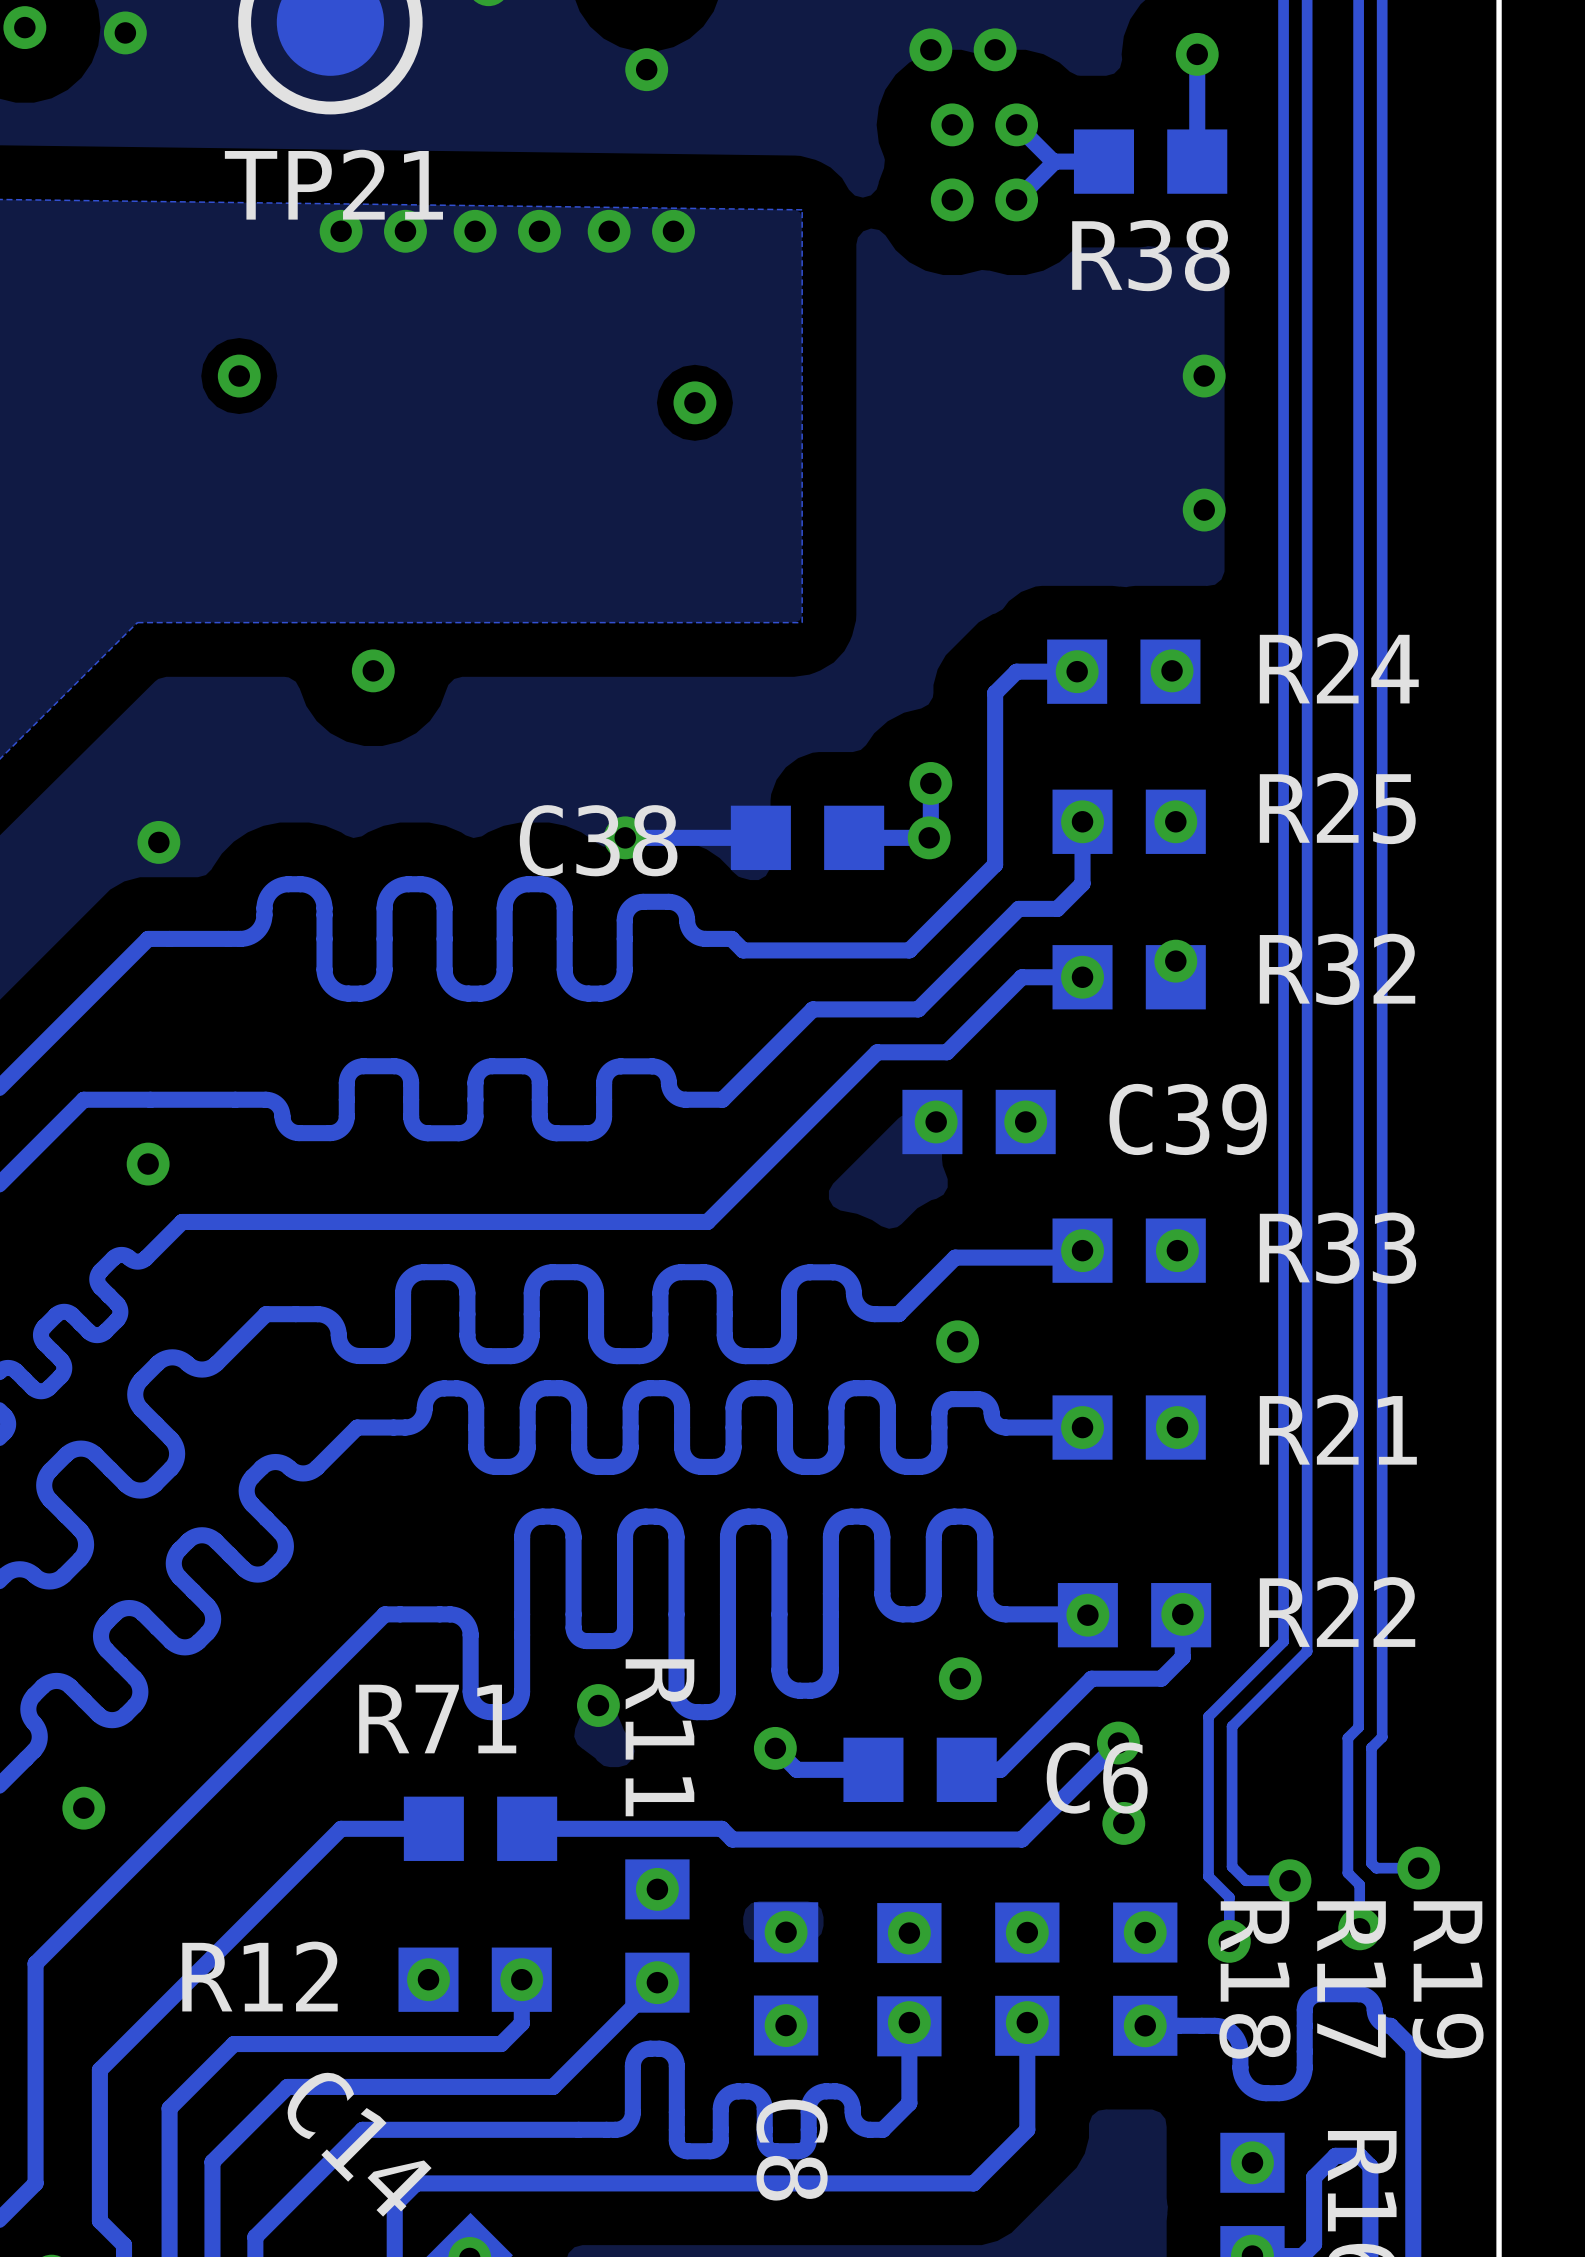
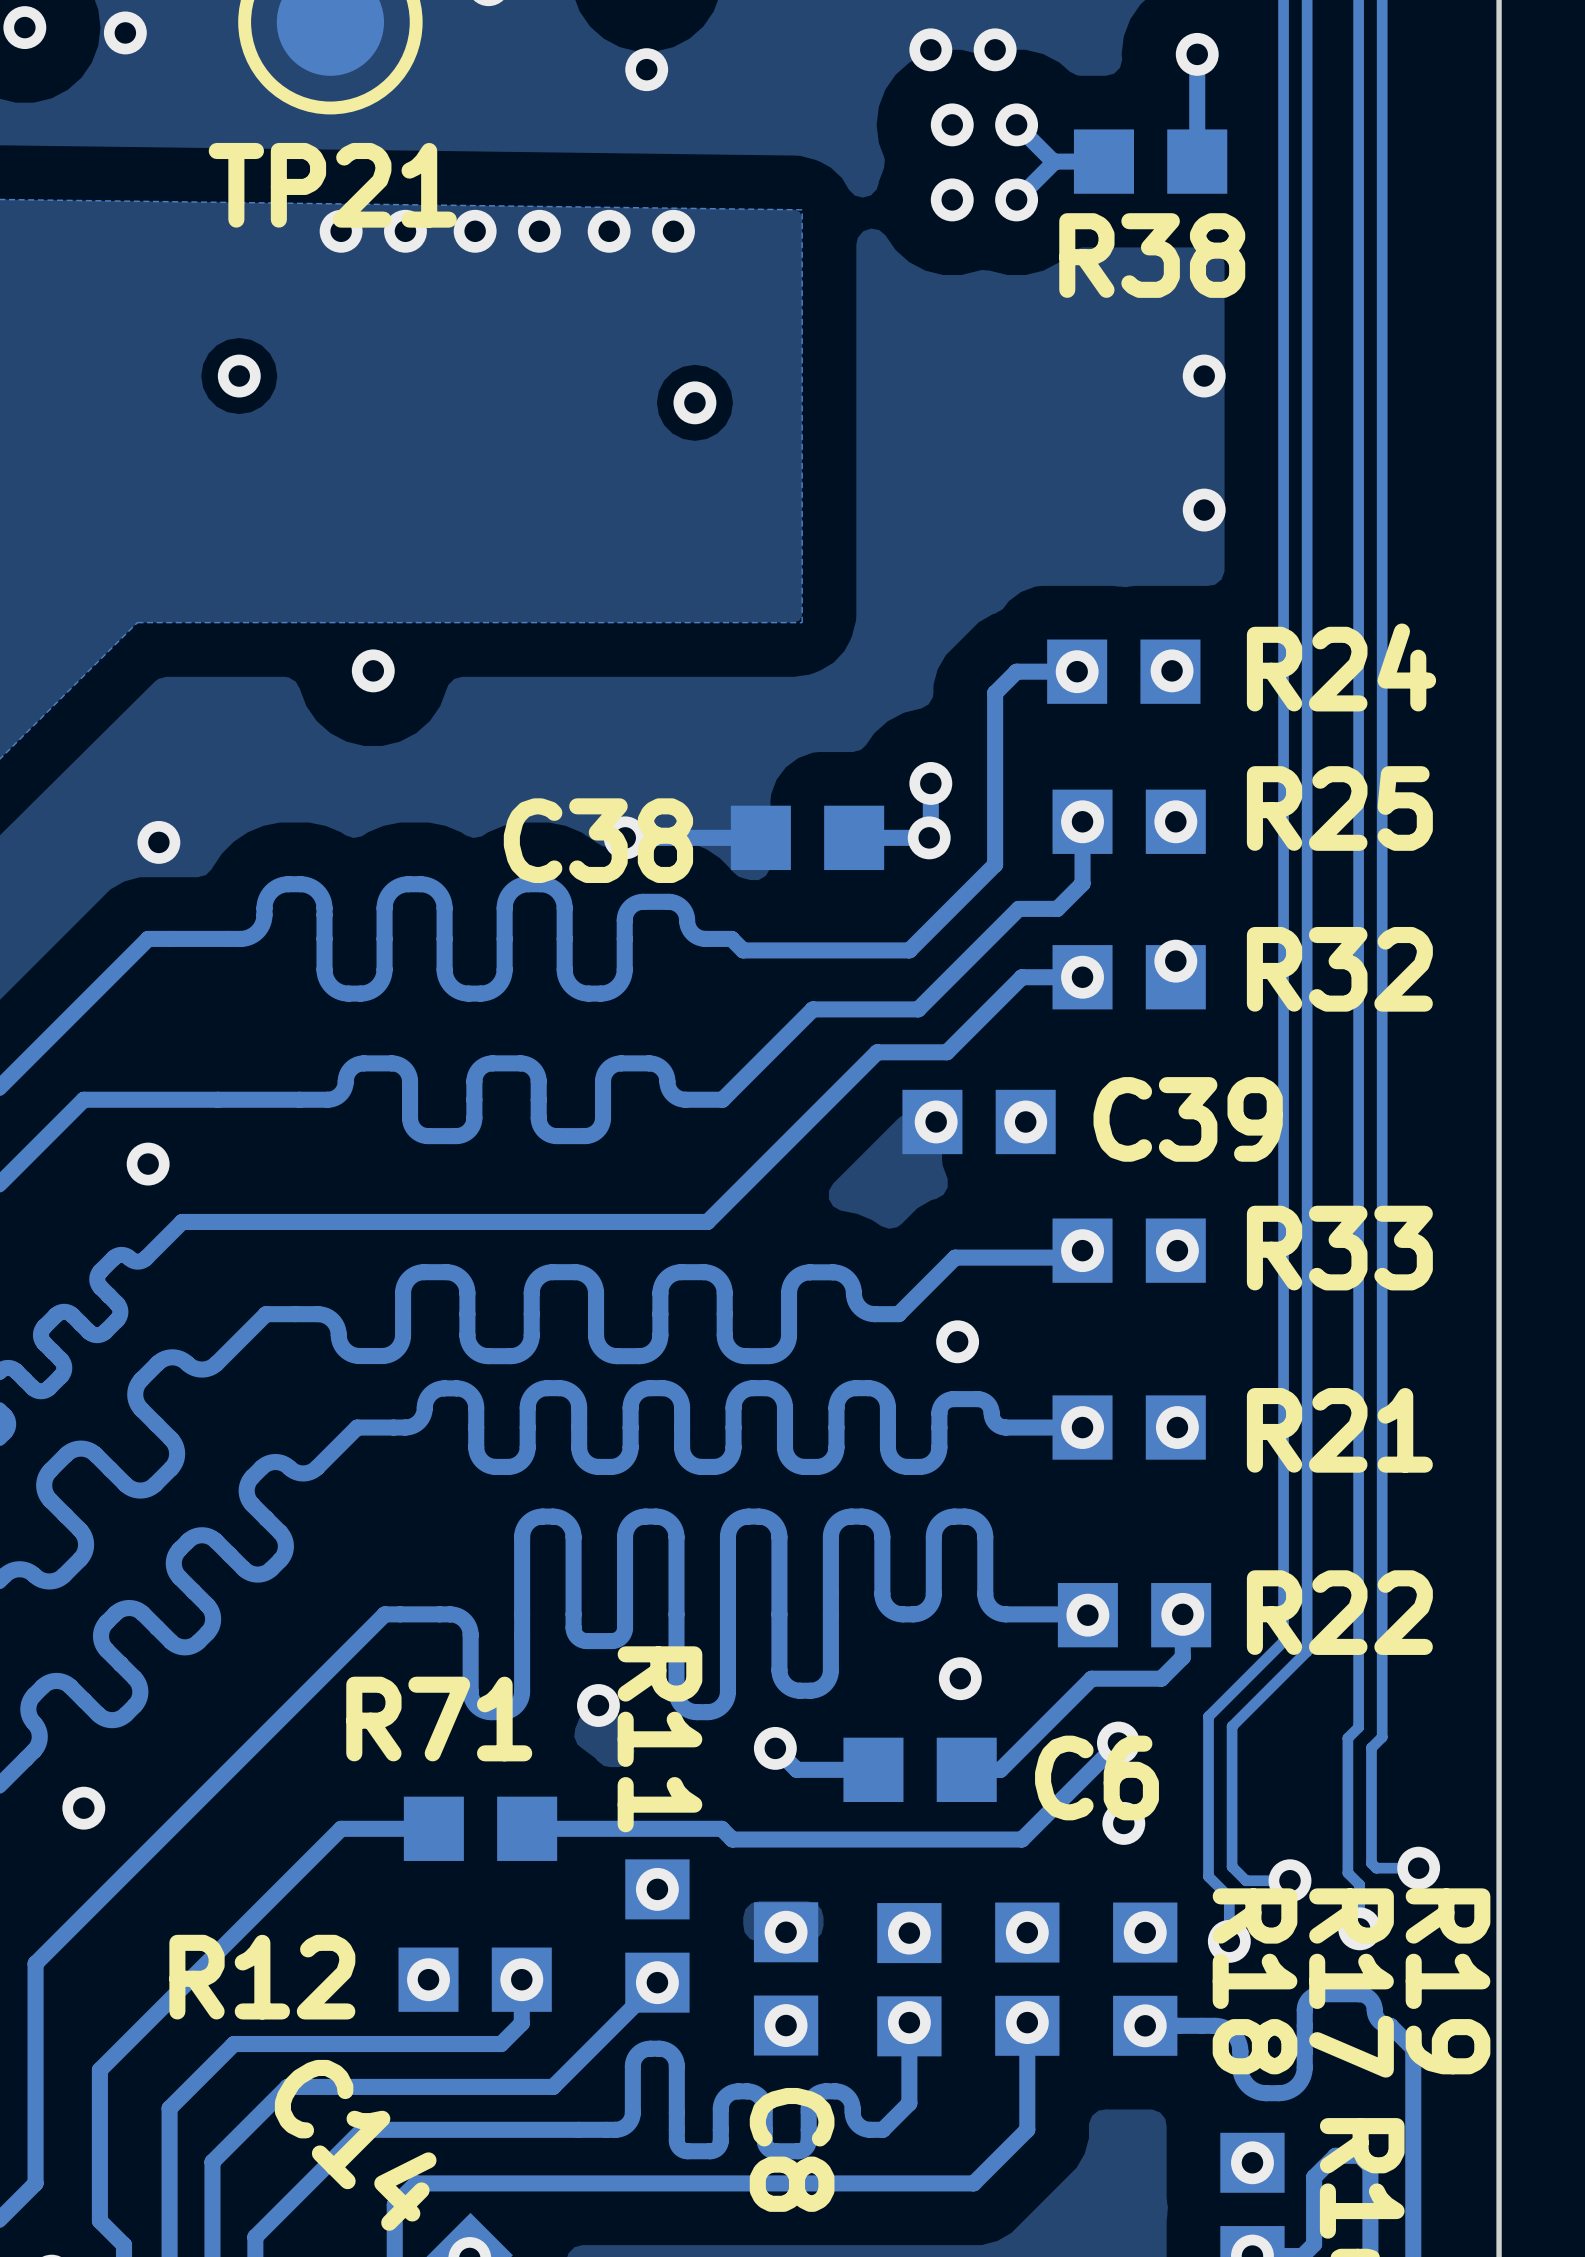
track: (685, 1099) (677, 1097) (672, 1093) (666, 1074) (658, 1067) (616, 1066) (608, 1071) (604, 1078) (604, 1118) (599, 1128) (589, 1133) (552, 1132) (546, 1129) (540, 1122) (539, 1081) (534, 1071) (524, 1066) (490, 1066) (481, 1069) (475, 1079) (474, 1122) (468, 1129) (458, 1133) (425, 1133) (416, 1128) (411, 1118) (410, 1077) (404, 1069) (398, 1066) (361, 1066) (351, 1071) (346, 1081) (346, 1120) (341, 1128) (334, 1132) (292, 1131) (284, 1124) (279, 1106) (274, 1101) (265, 1099) -> (685, 1099) (678, 1098) (671, 1092) (664, 1072) (656, 1064) (614, 1064) (606, 1070) (603, 1076) (602, 1123) (594, 1133) (584, 1136) (554, 1135) (542, 1129) (538, 1119) (537, 1075) (531, 1067) (522, 1063) (490, 1063) (478, 1070) (474, 1079) (473, 1123) (467, 1132) (458, 1135) (426, 1135) (414, 1129) (410, 1119) (409, 1077) (404, 1068) (395, 1063) (363, 1063) (356, 1065) (347, 1073) (341, 1092) (331, 1099) (265, 1099)

